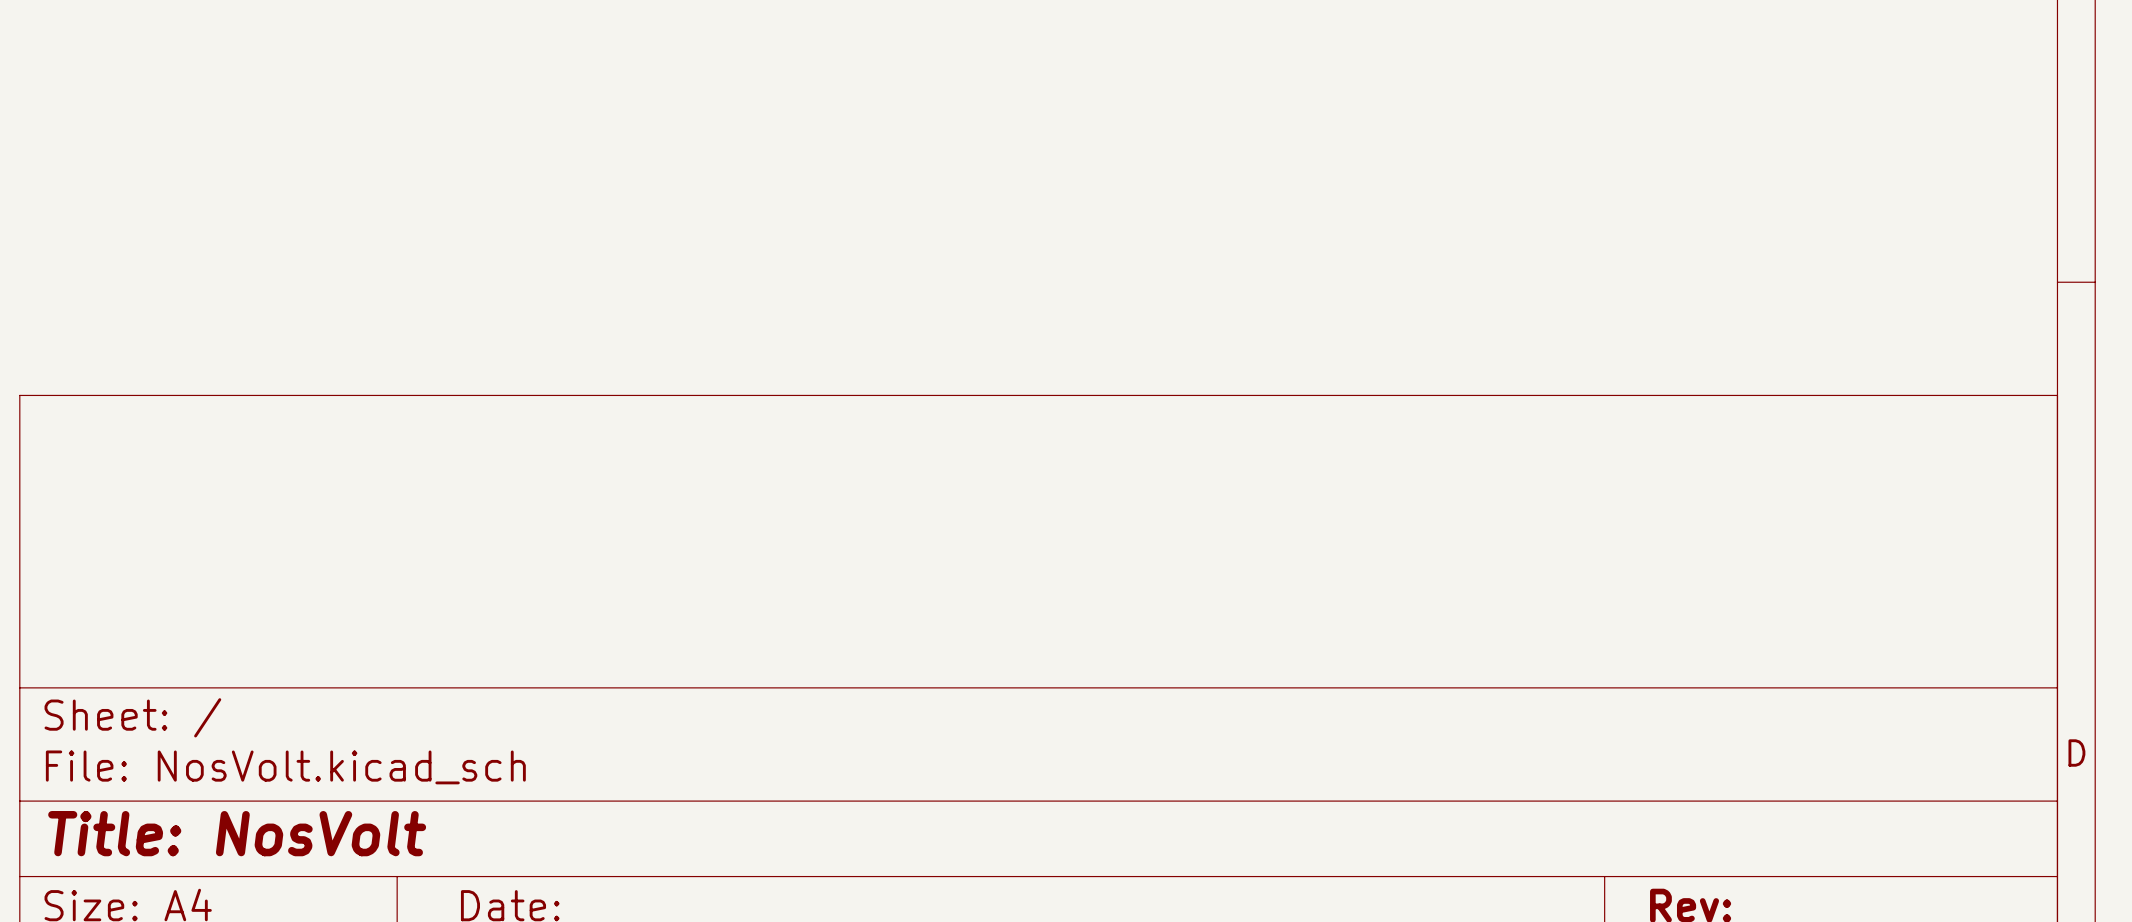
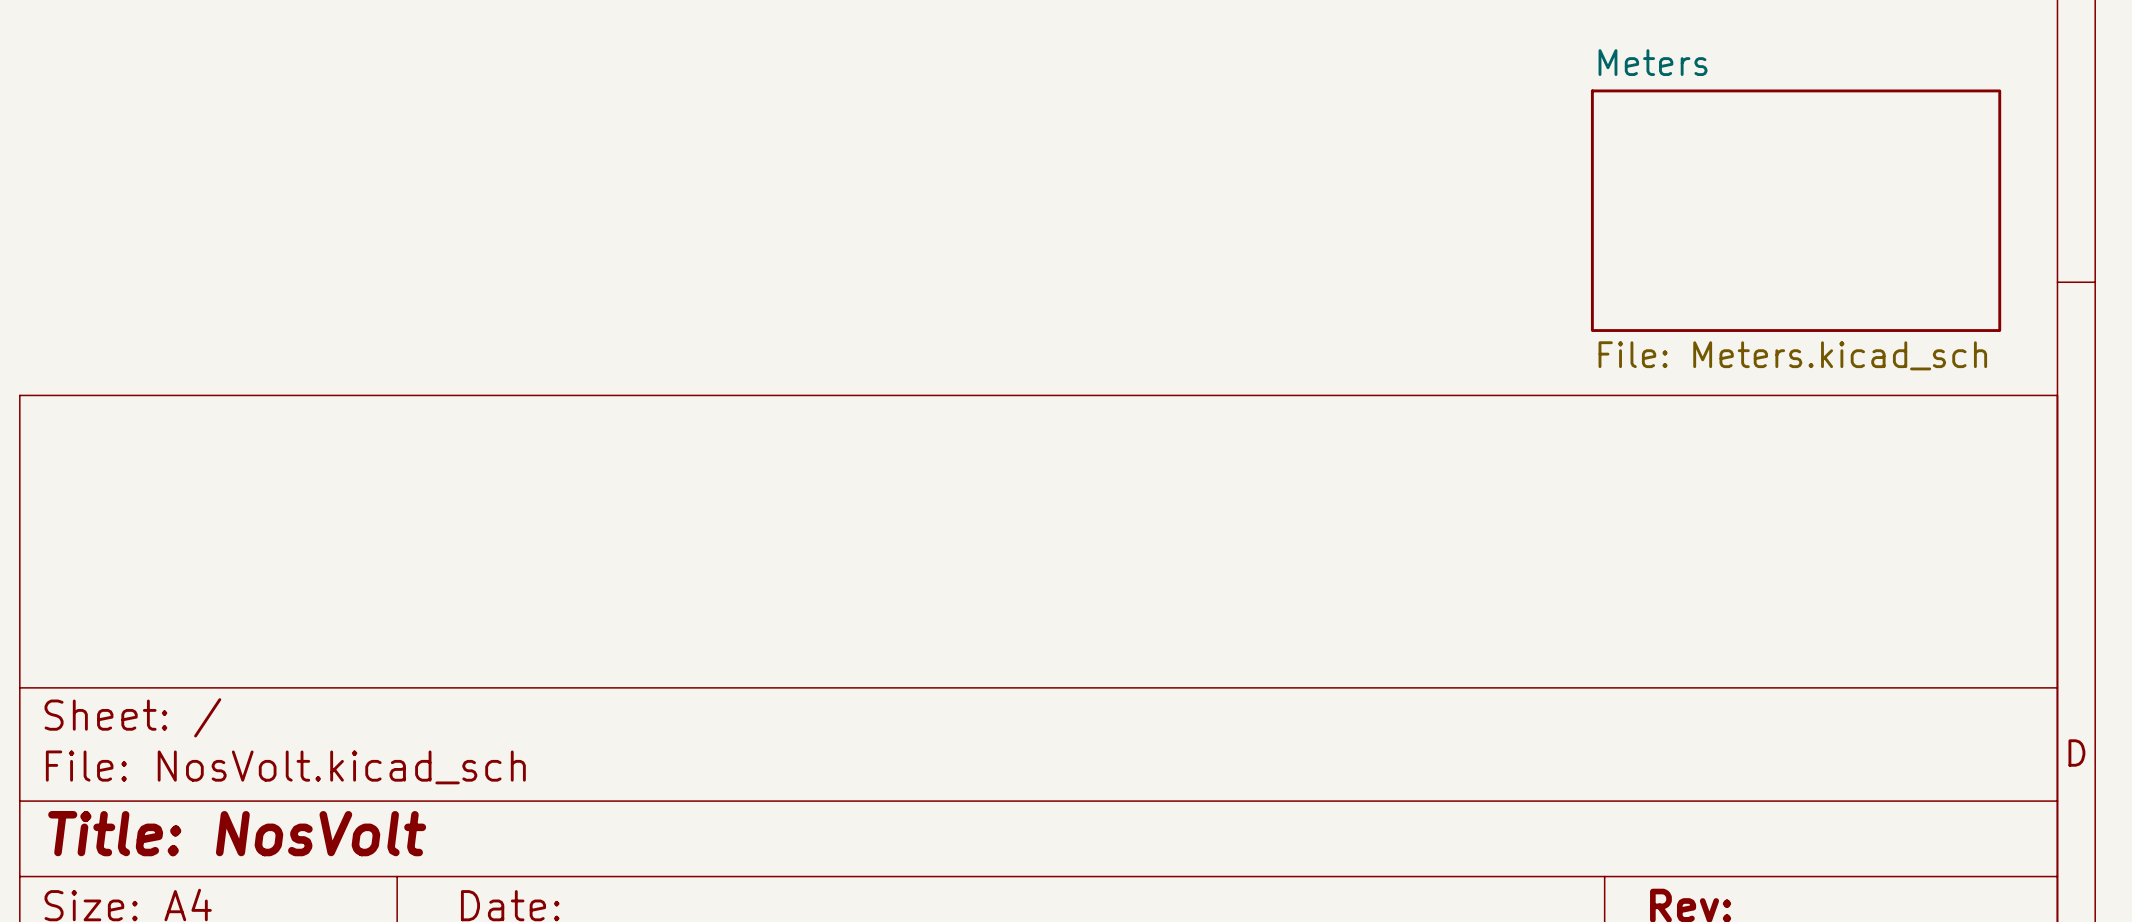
sheet Meters: none -> File: Meters.kicad_sch (1796, 210)

